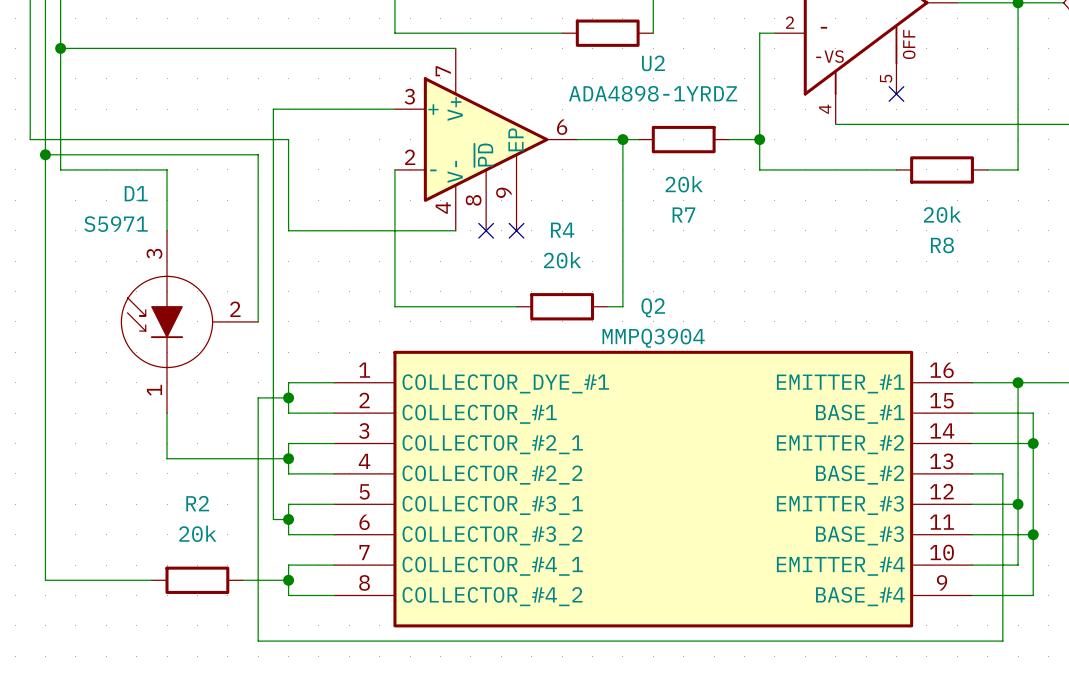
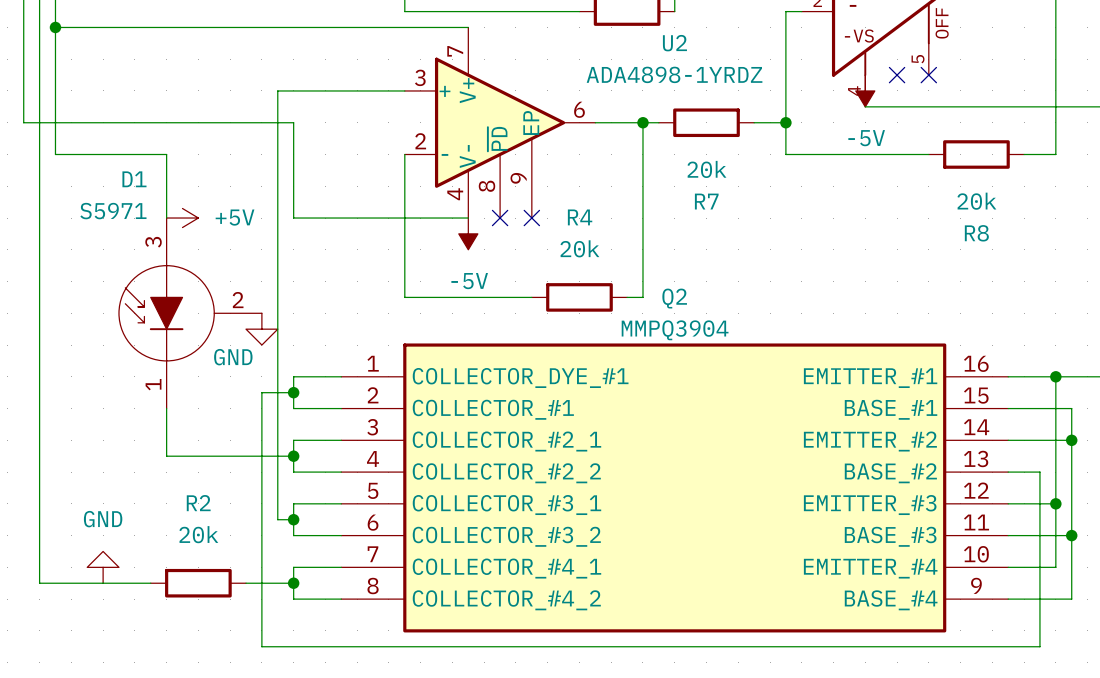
no-connect mark: none -> (897, 75)
power symbol: none -> -5V (865, 90)
wire: (45, 154) (258, 154) (258, 321) -> none
junction: (45, 154) -> none
power symbol: none -> +5V (182, 218)
power symbol: none -> -5V (468, 233)
power symbol: none -> GND (261, 329)
power symbol: none -> GND (103, 567)

